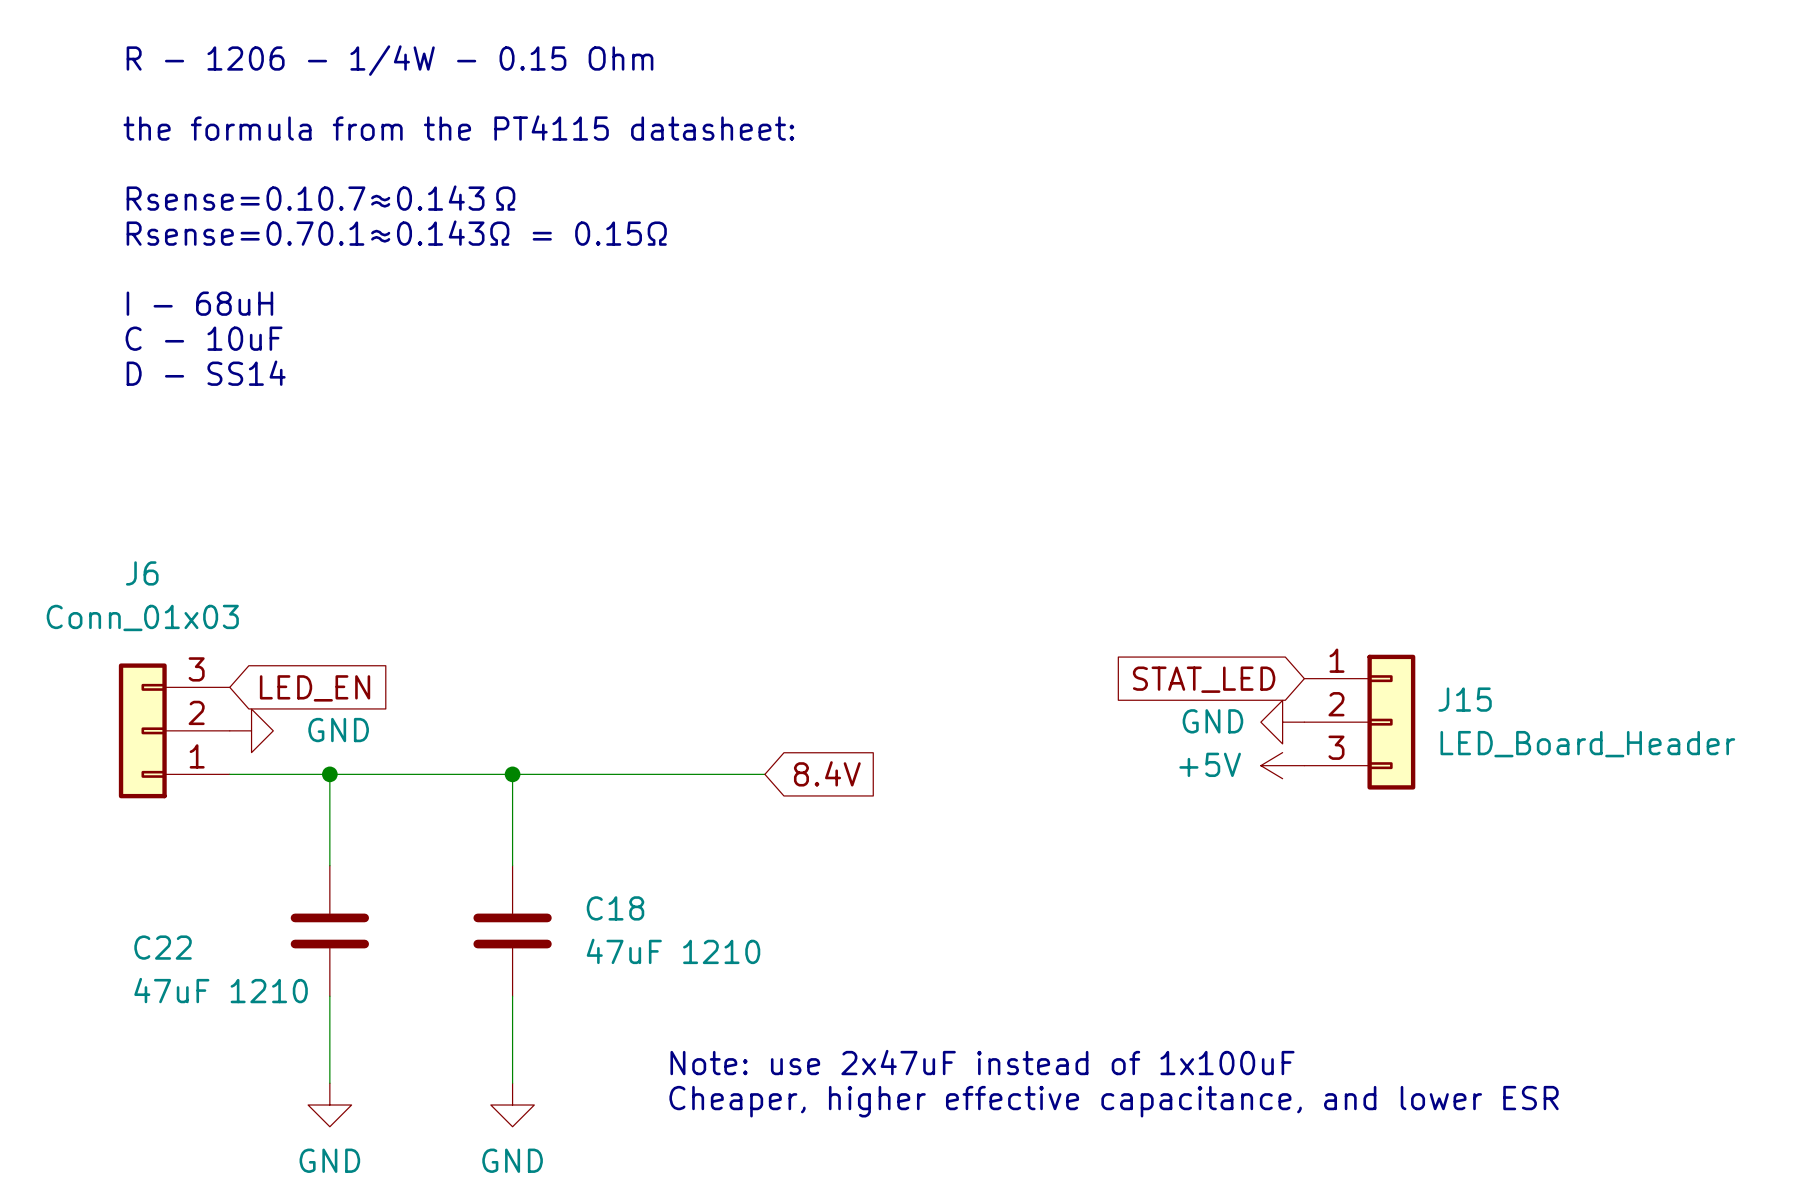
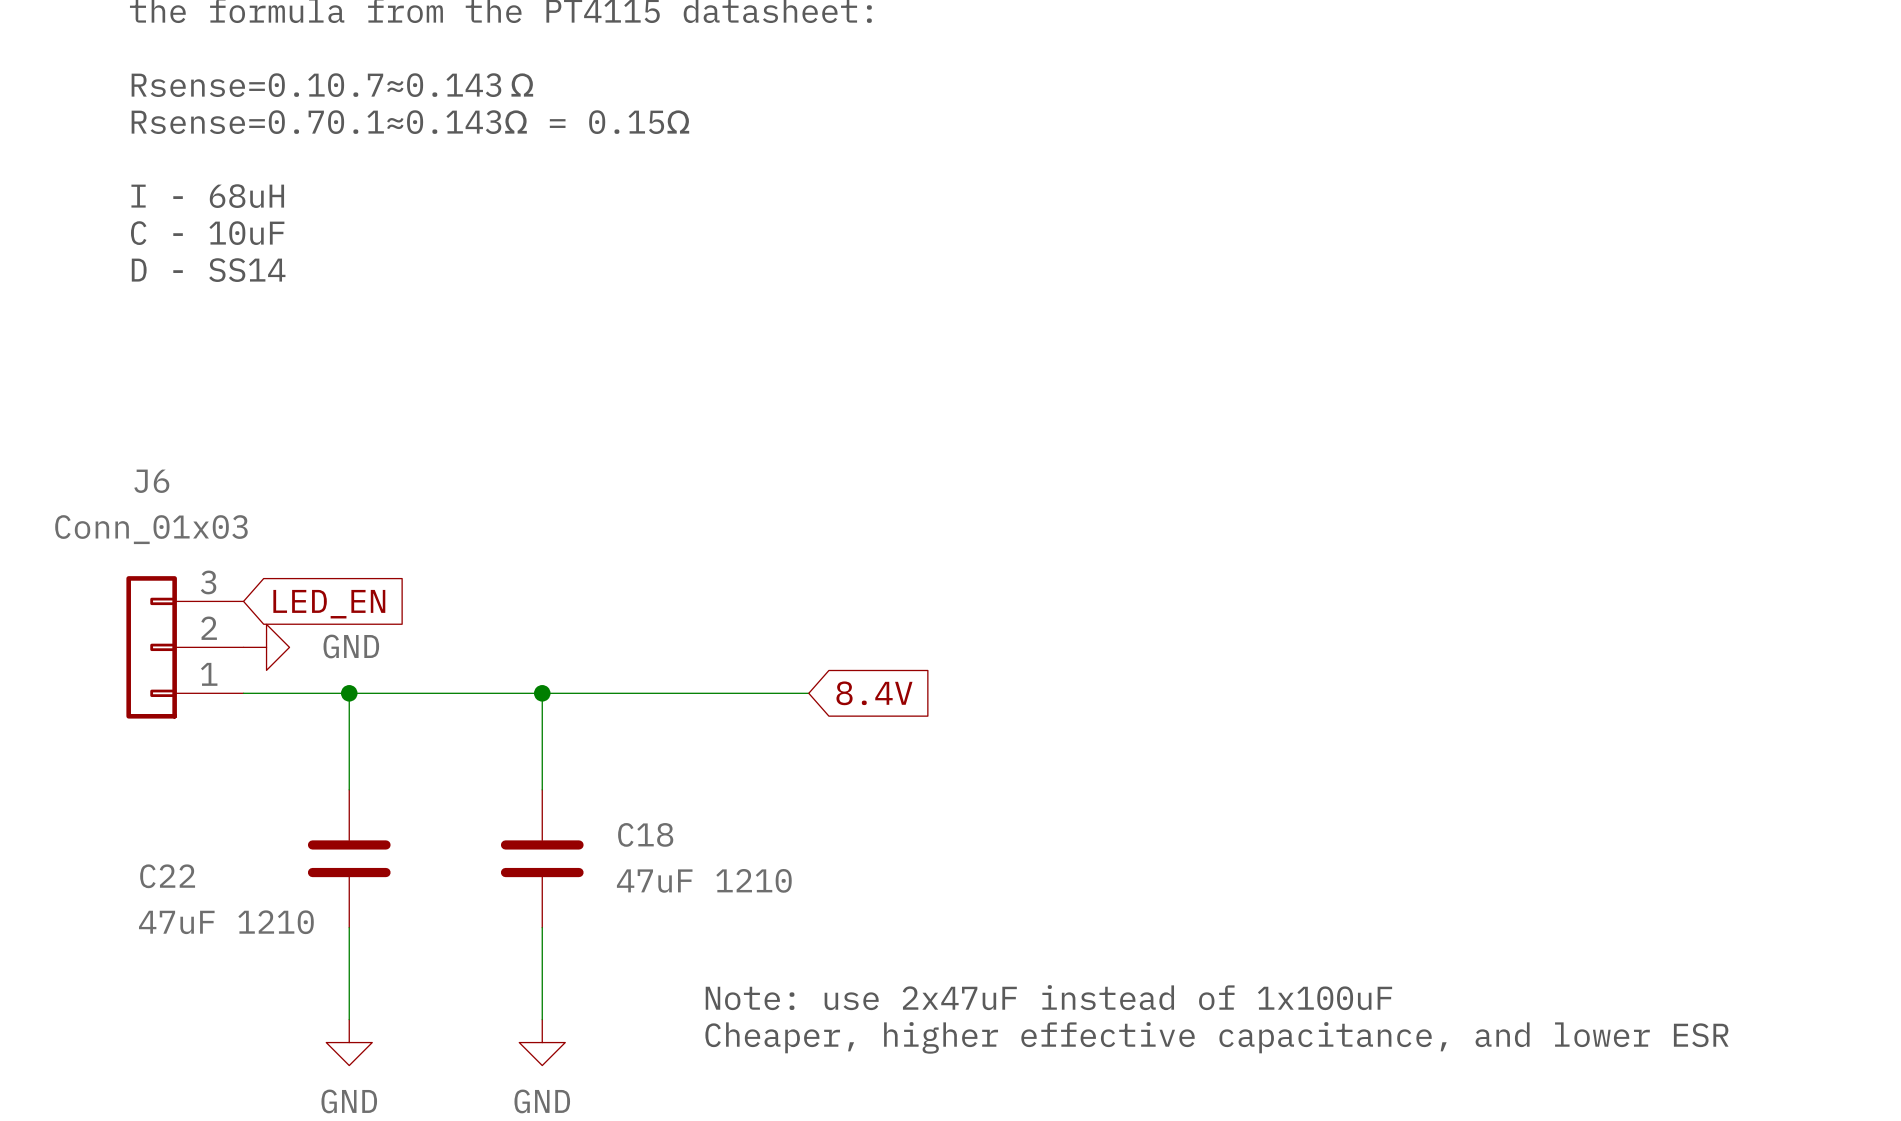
global label: STAT_LED (1204, 679) -> none
power symbol: GND (1282, 722) -> none
J15: LED_Board_Header (1359, 722) -> none
power symbol: +5V (1282, 765) -> none

